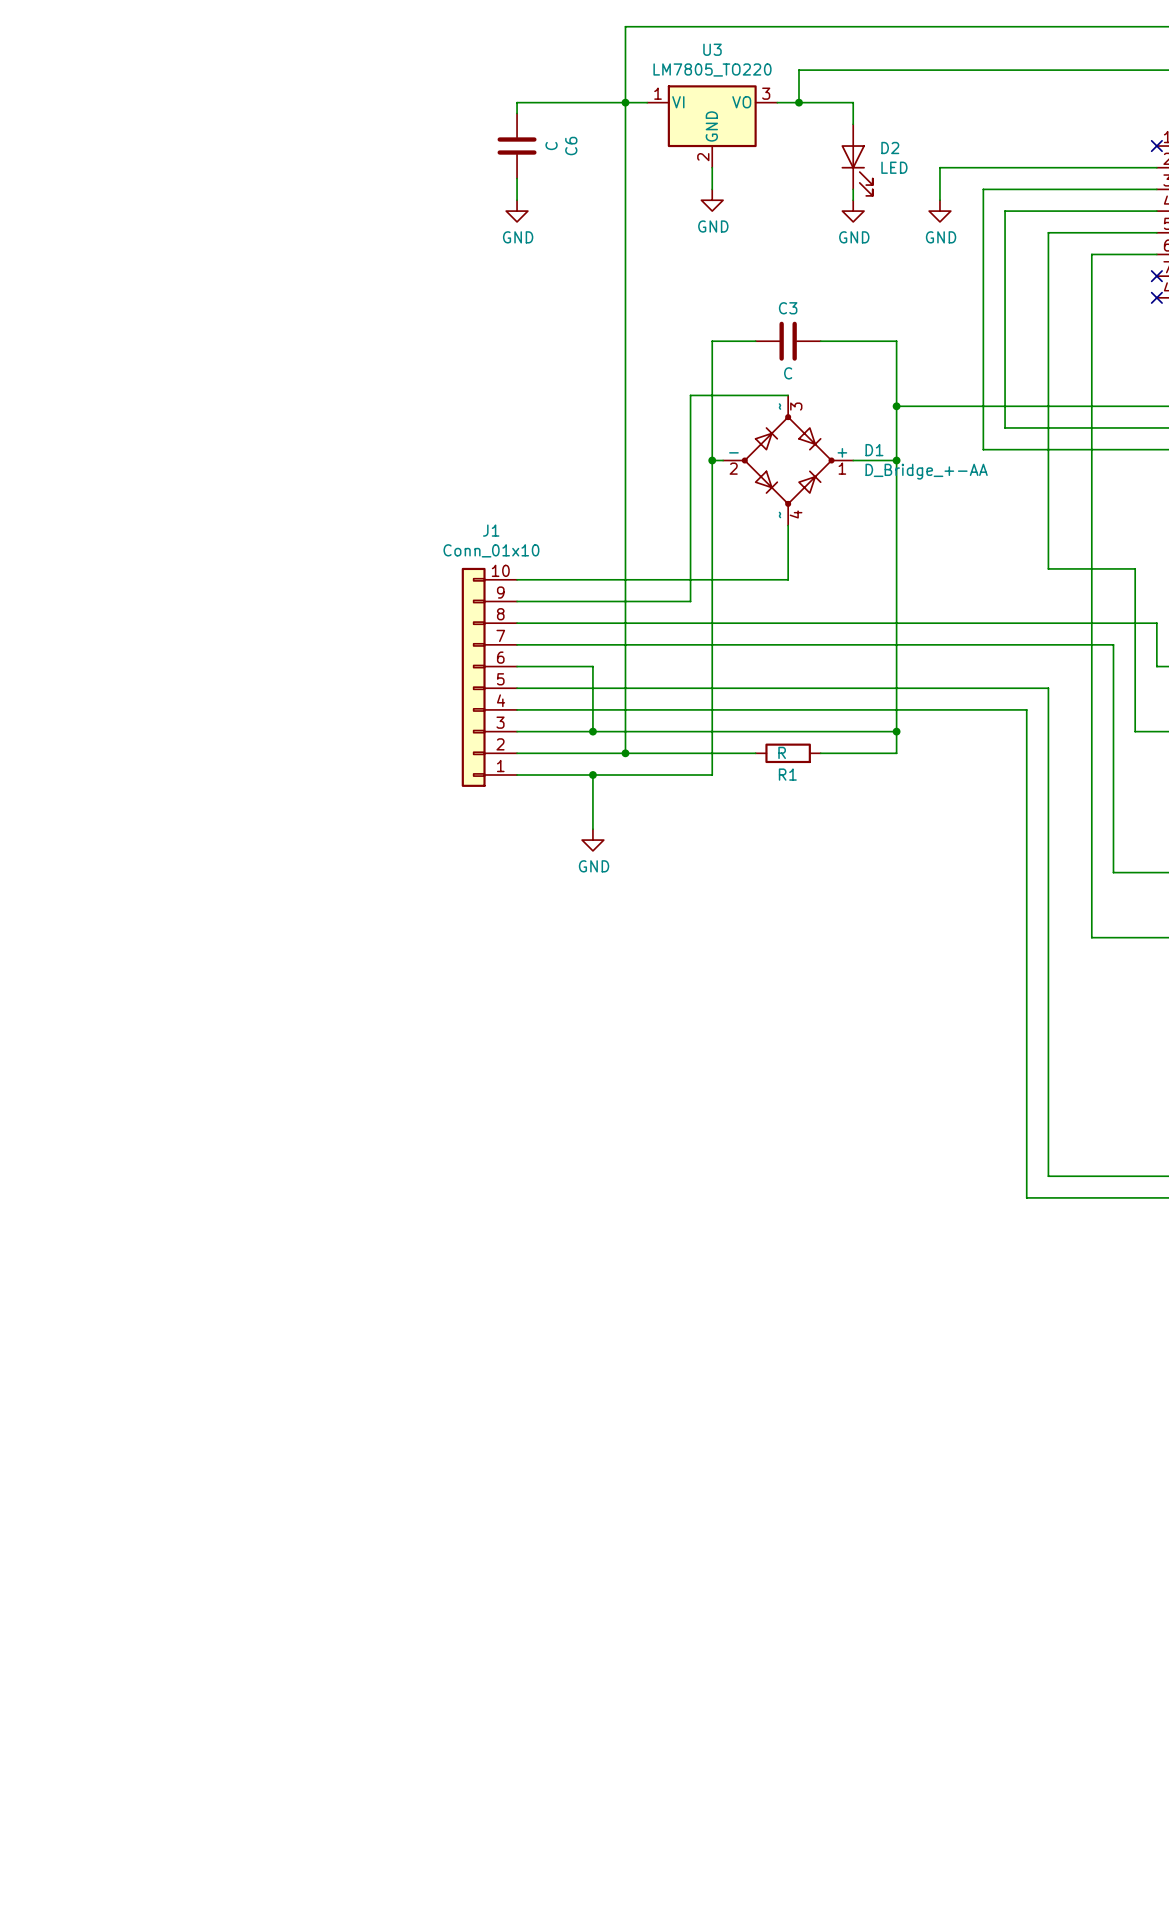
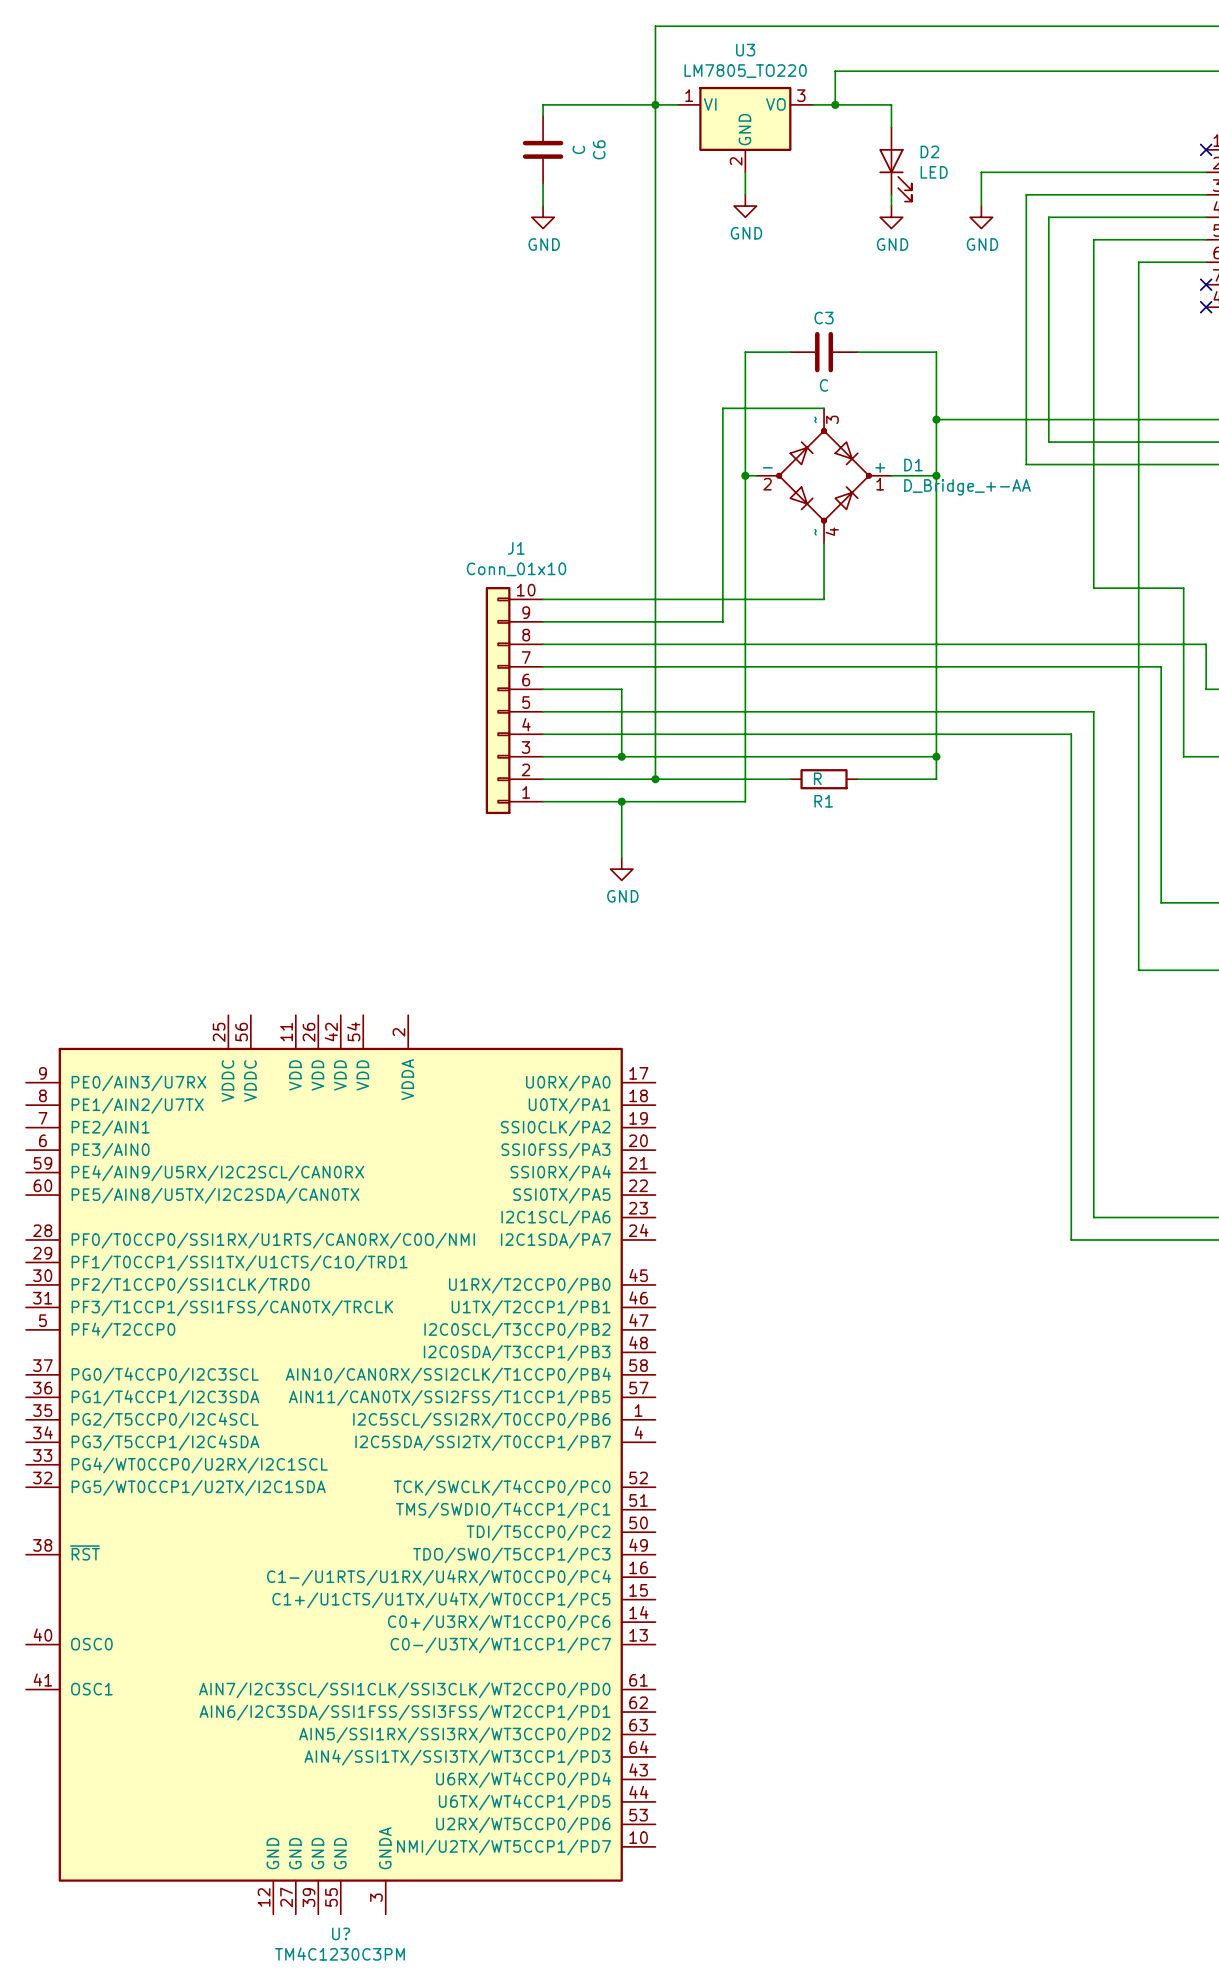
U?: none -> TM4C1230C3PM (340, 1464)

